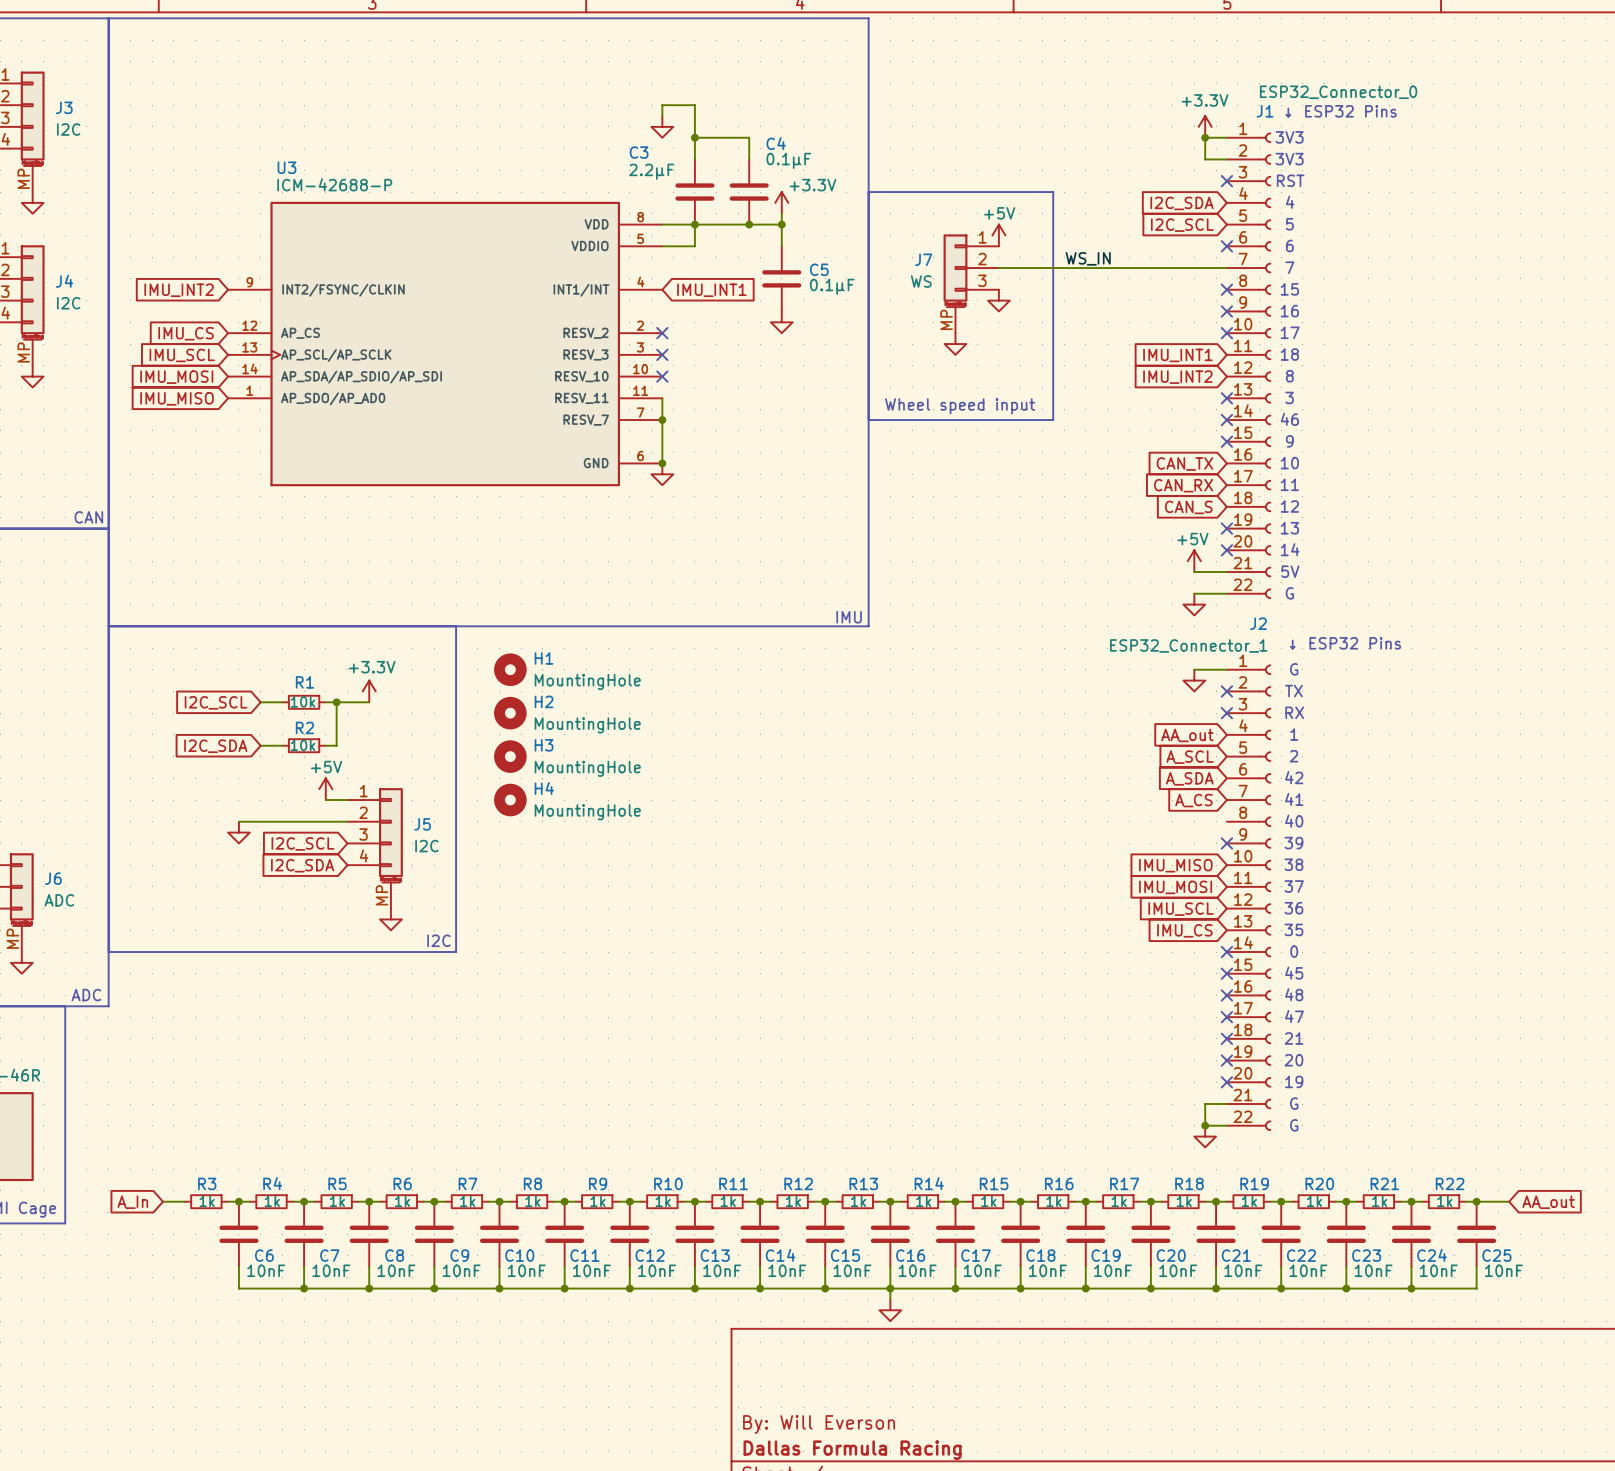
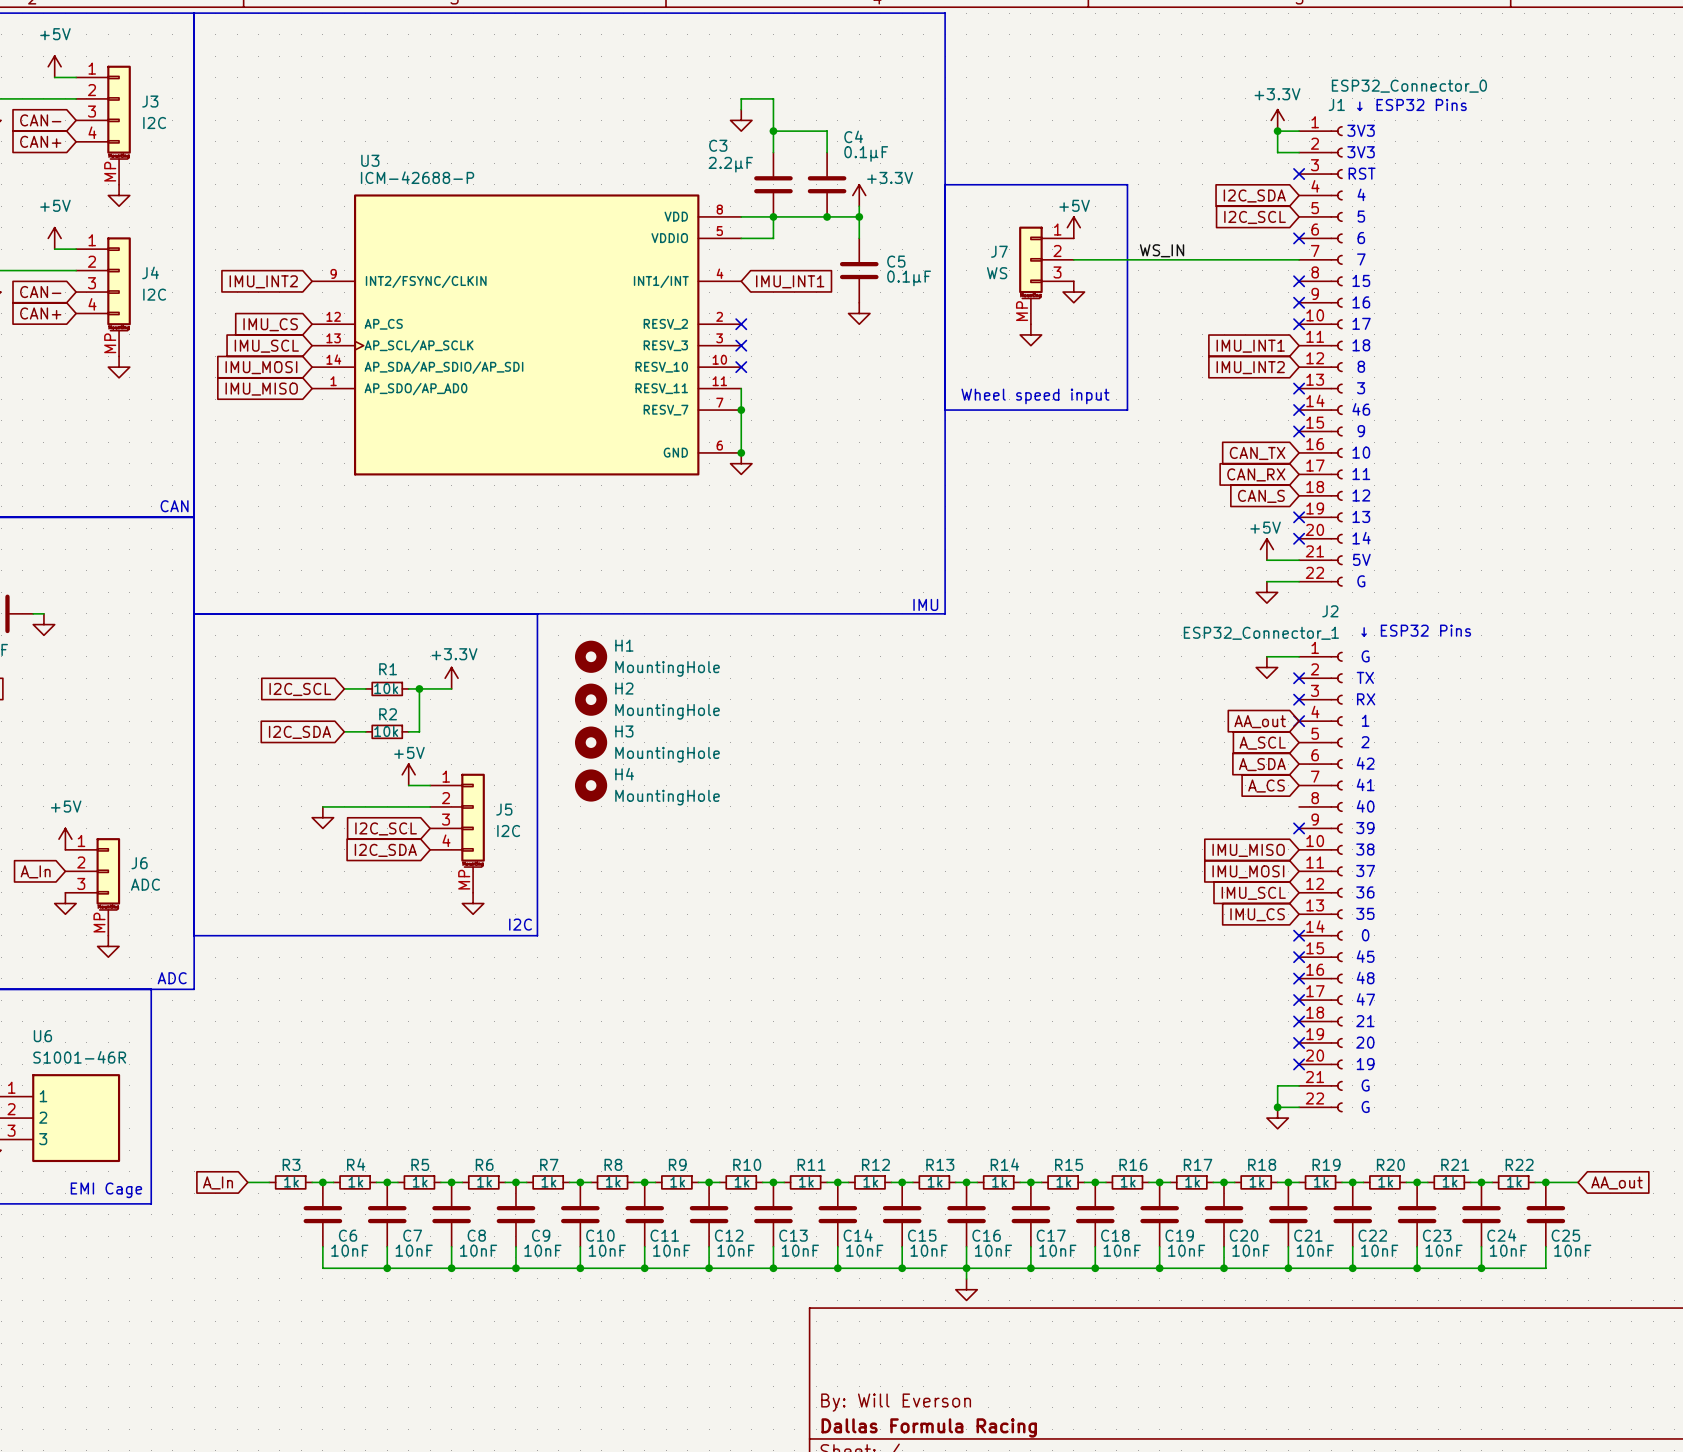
no-connect mark: none -> (1299, 721)

